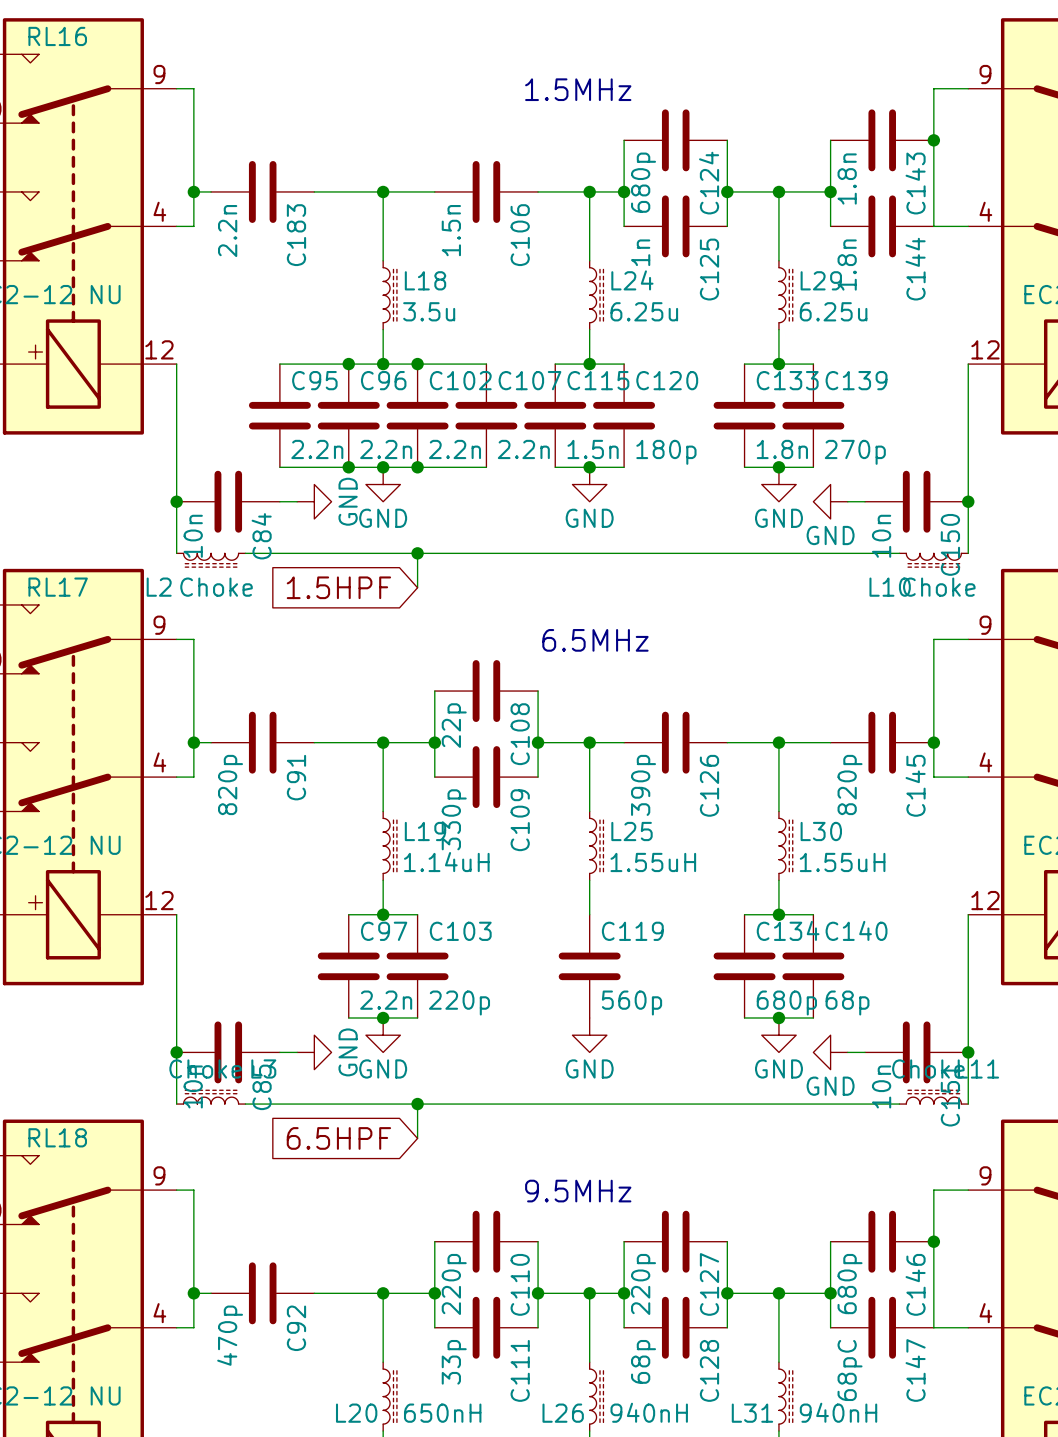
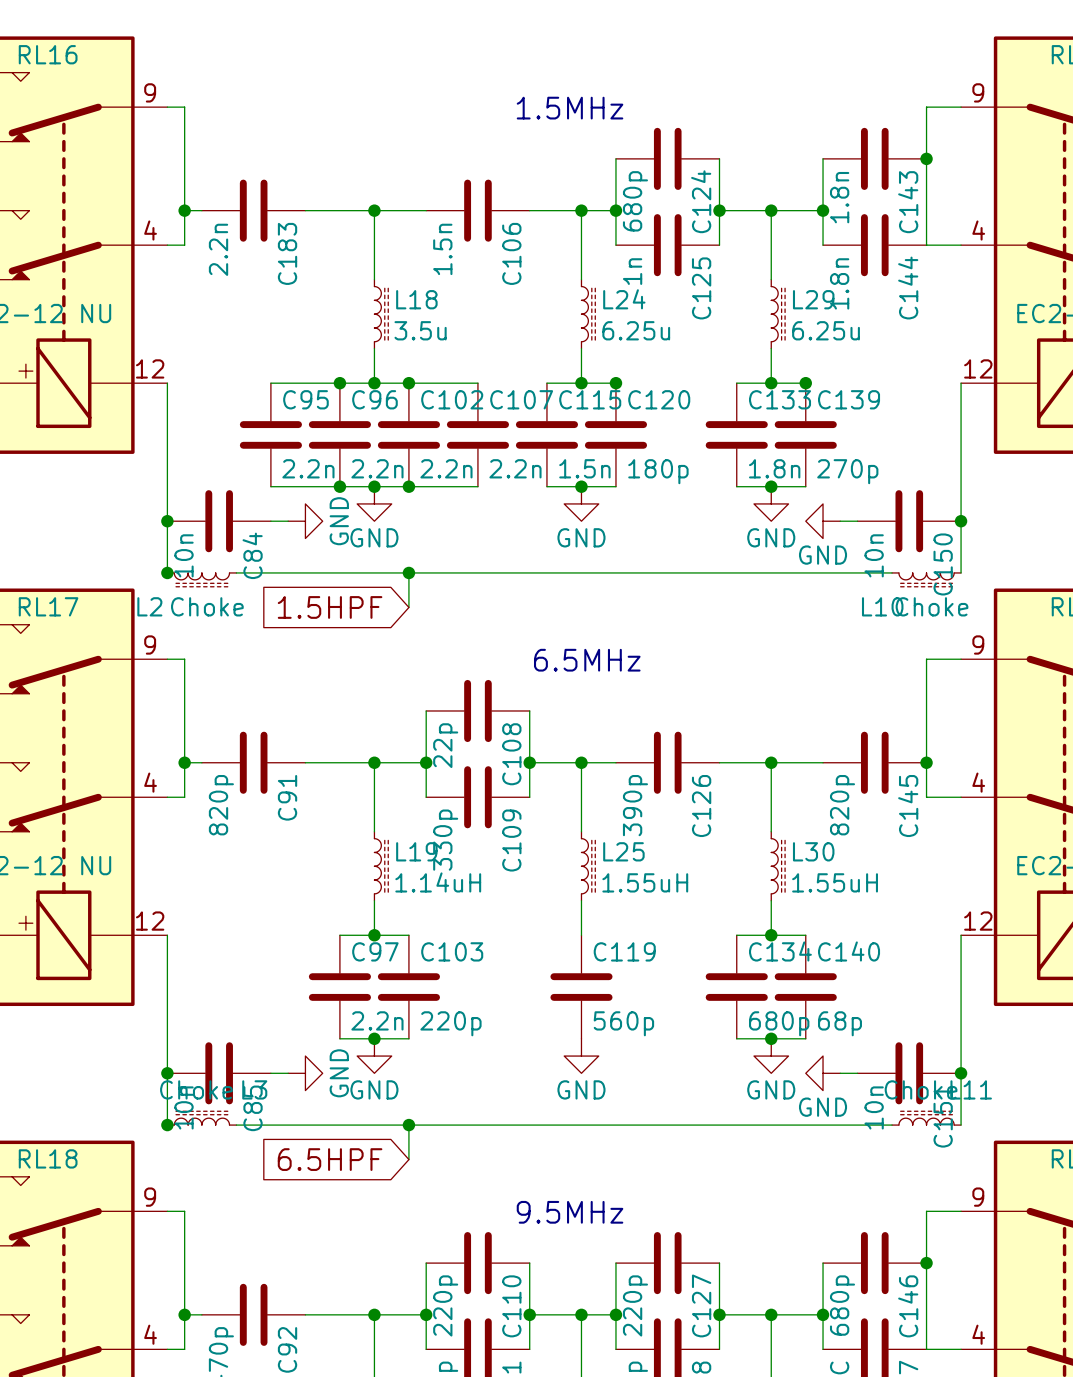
junction: none -> (615, 383)
junction: none -> (805, 383)
junction: none -> (167, 572)
junction: none -> (167, 1125)

